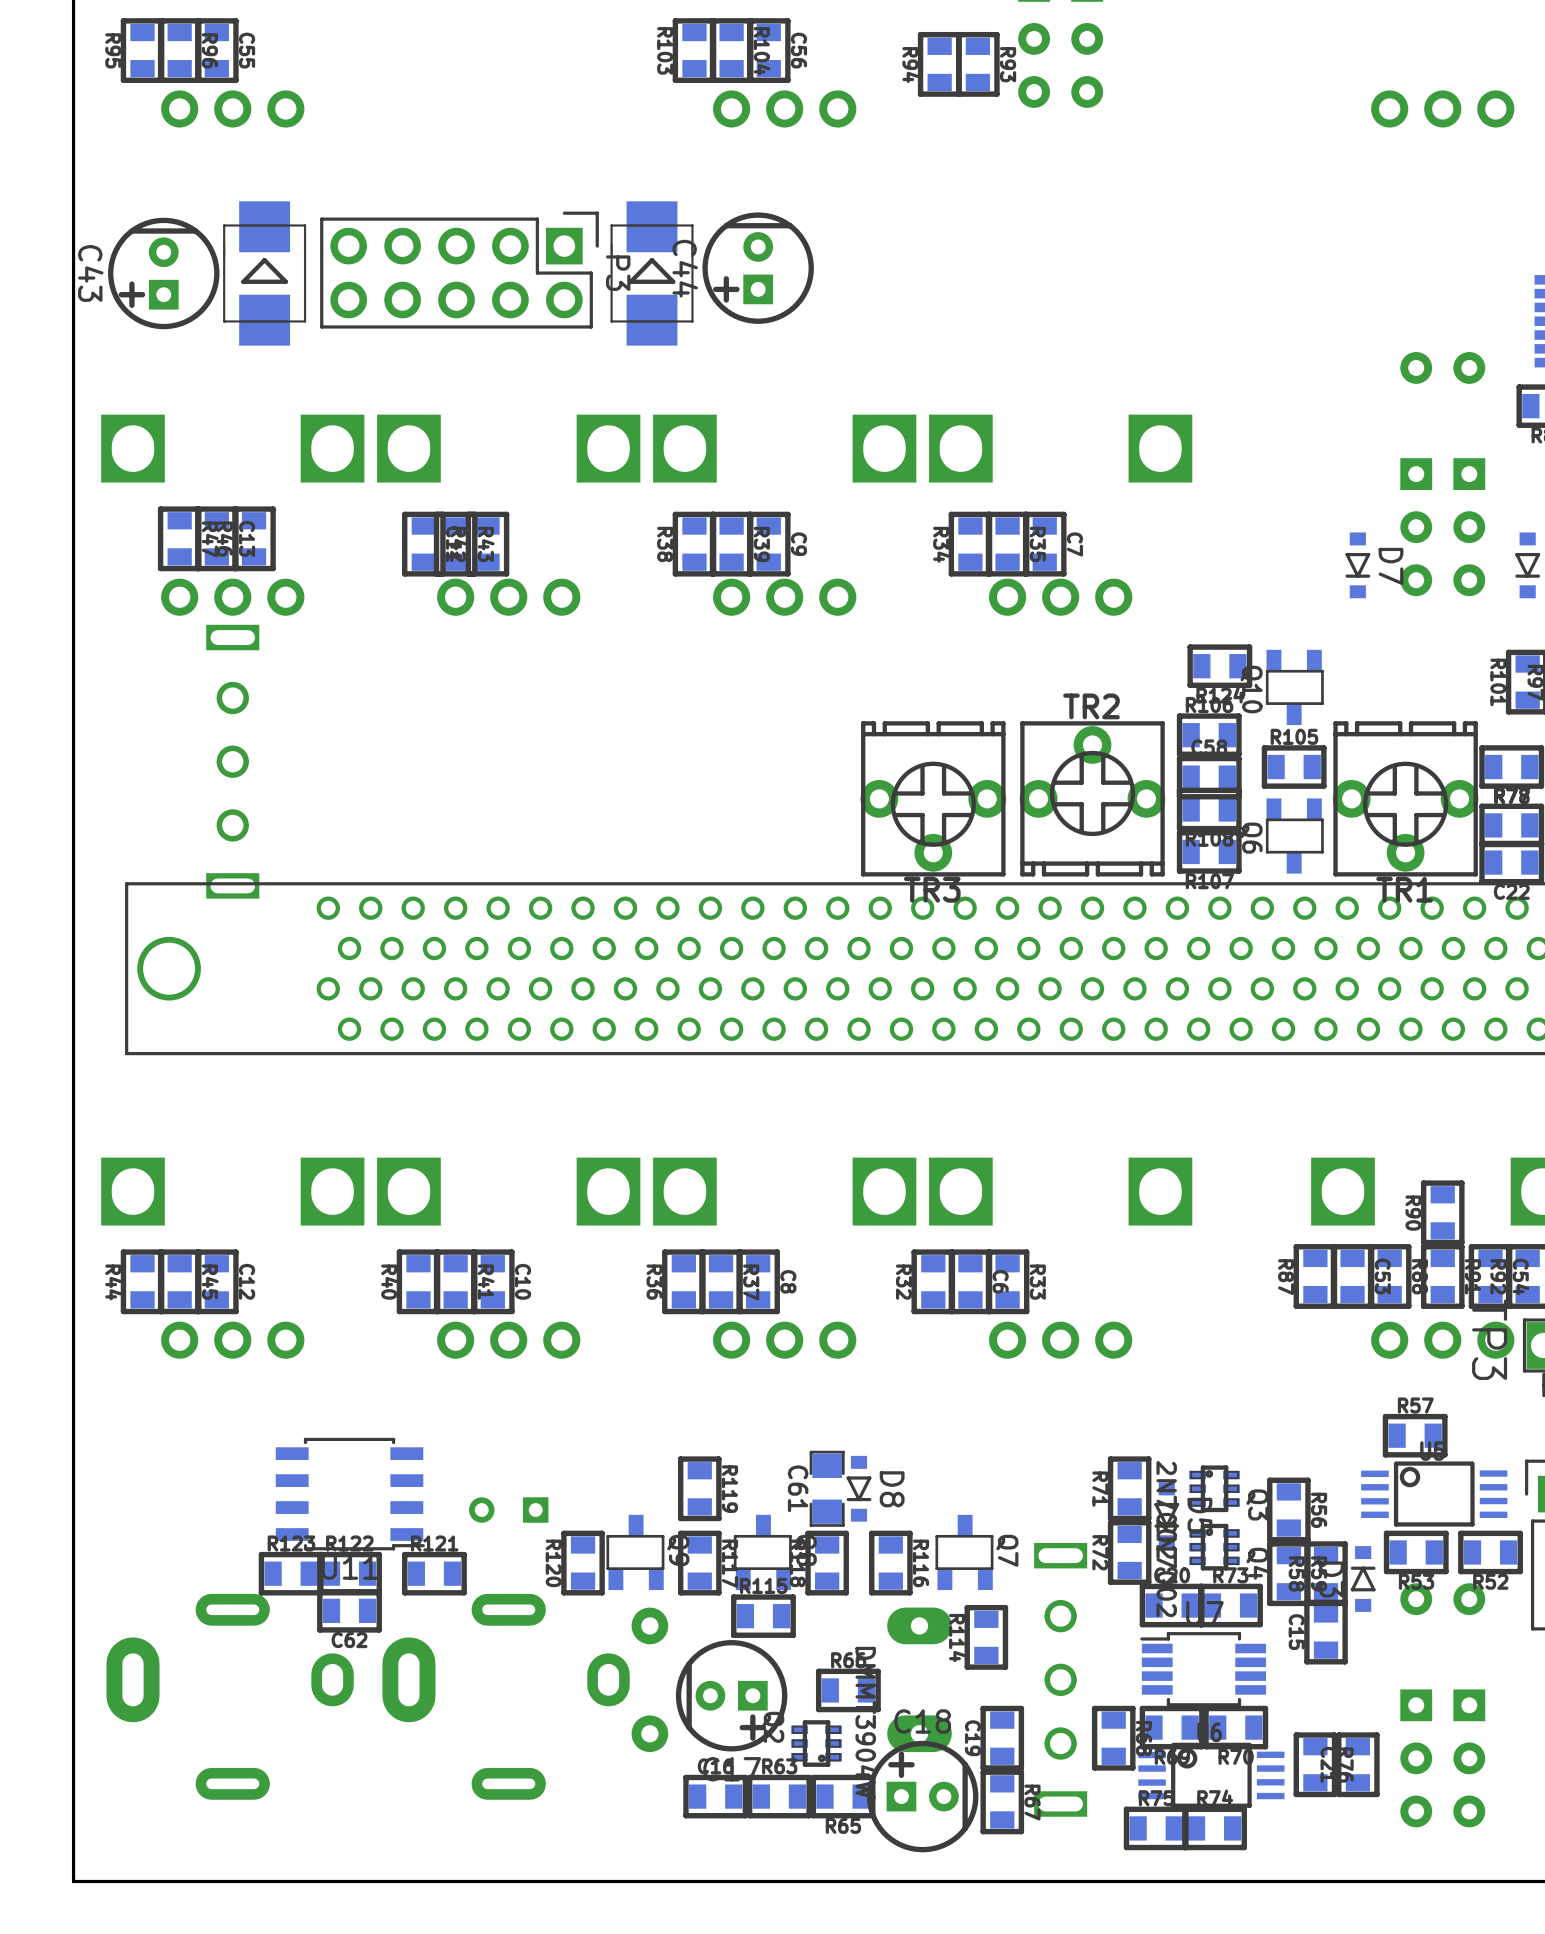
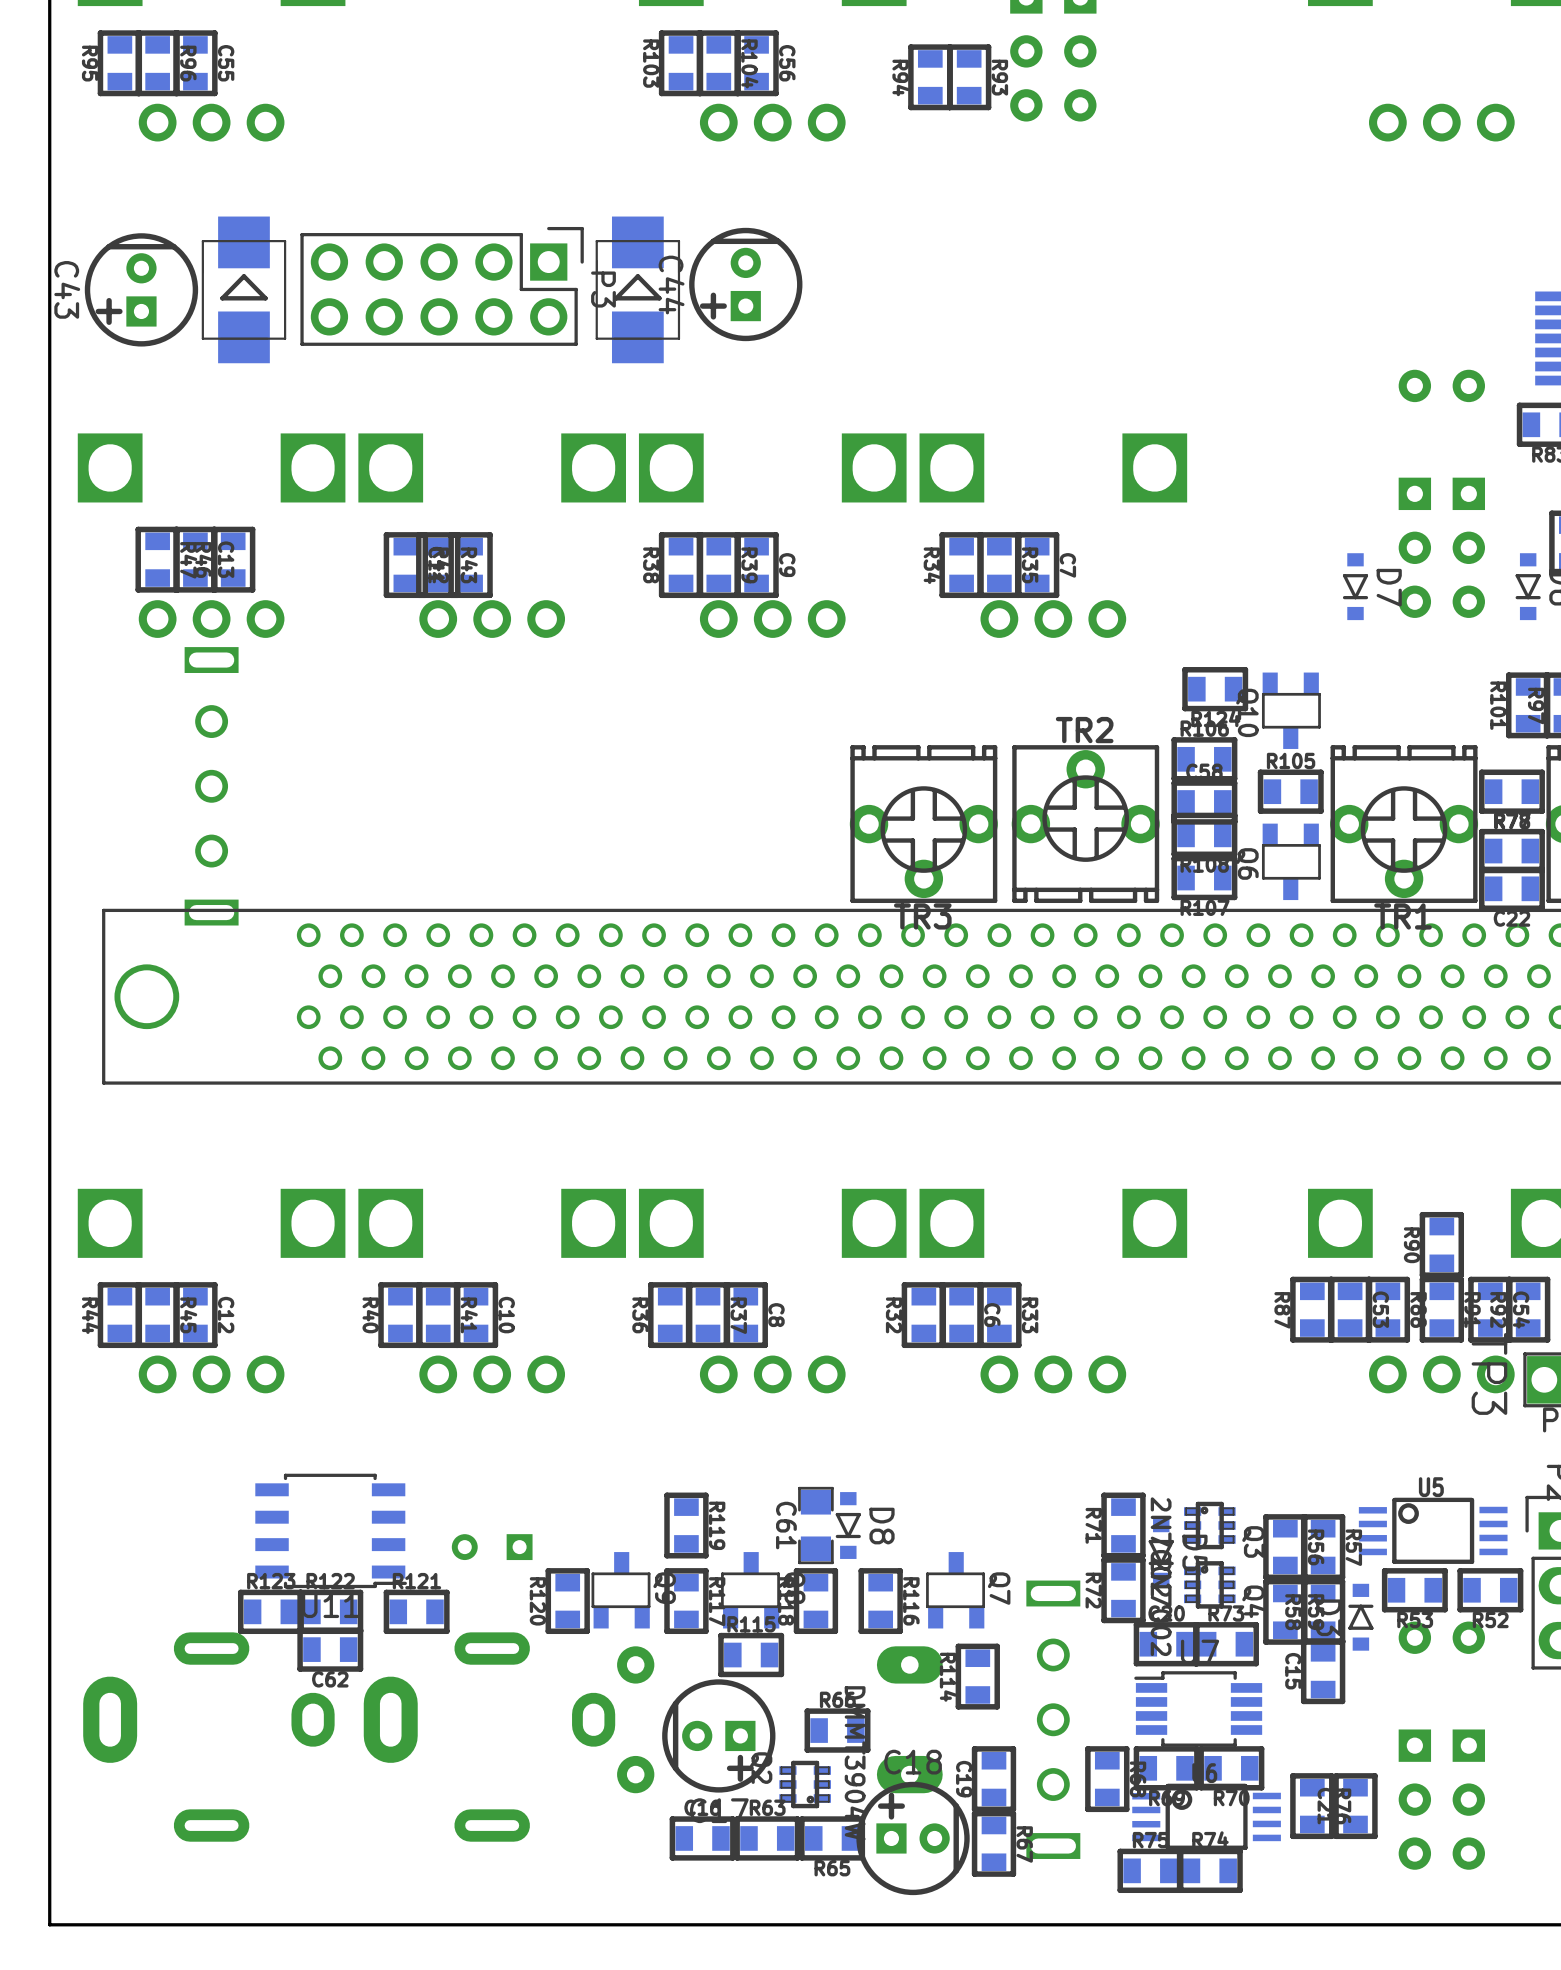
R57 rotation: 0° (1415, 1435) -> 90° clockwise (1323, 1547)
R57 position: (1415, 1435) -> (1323, 1547)

